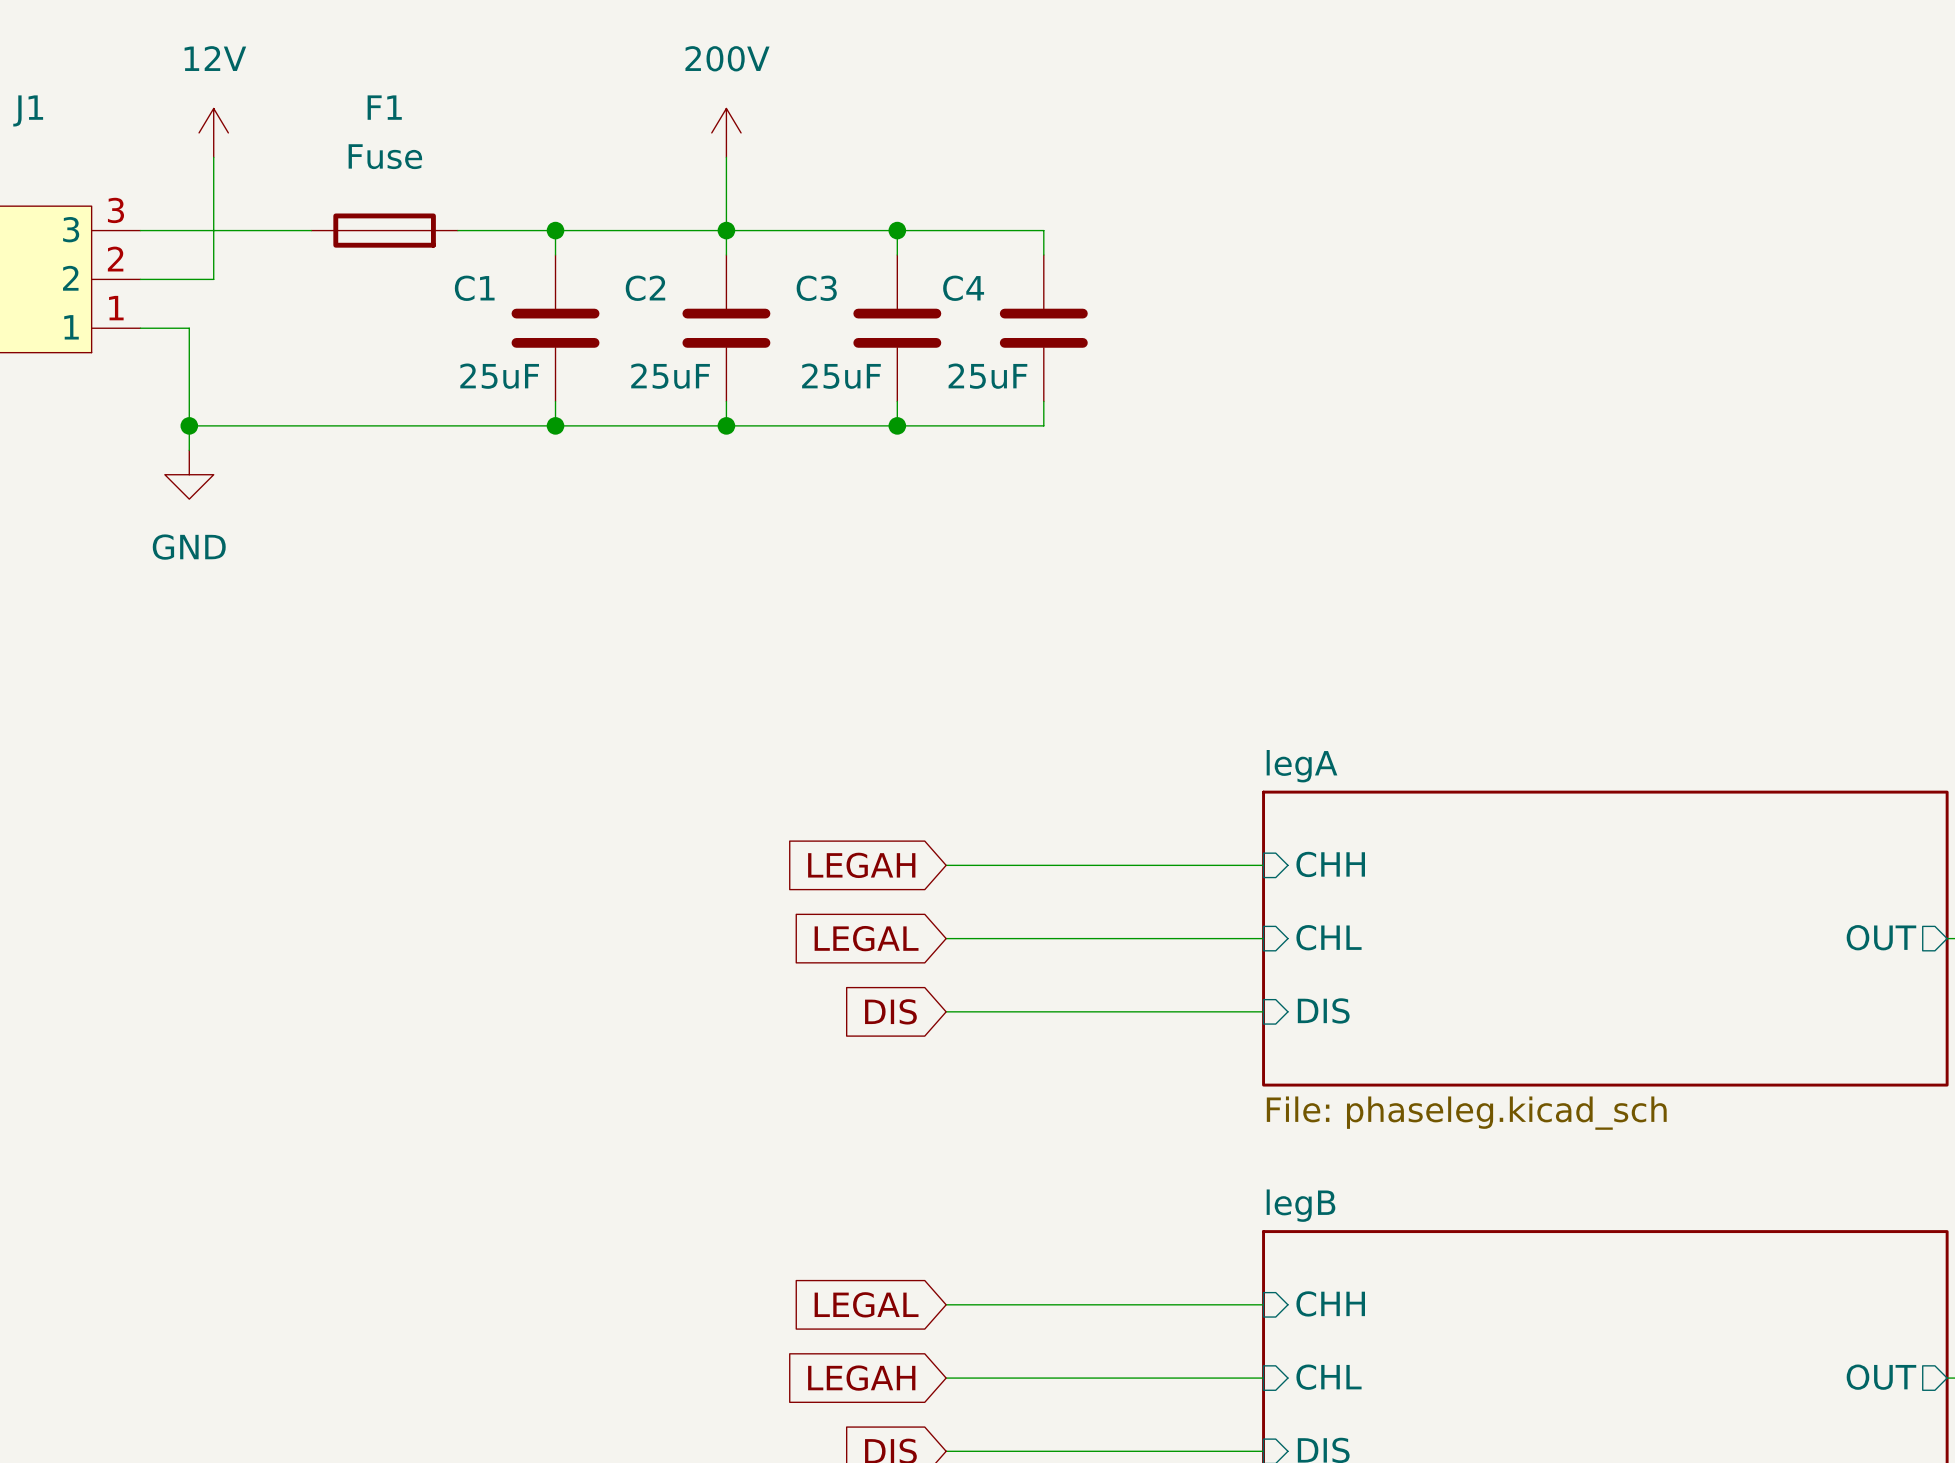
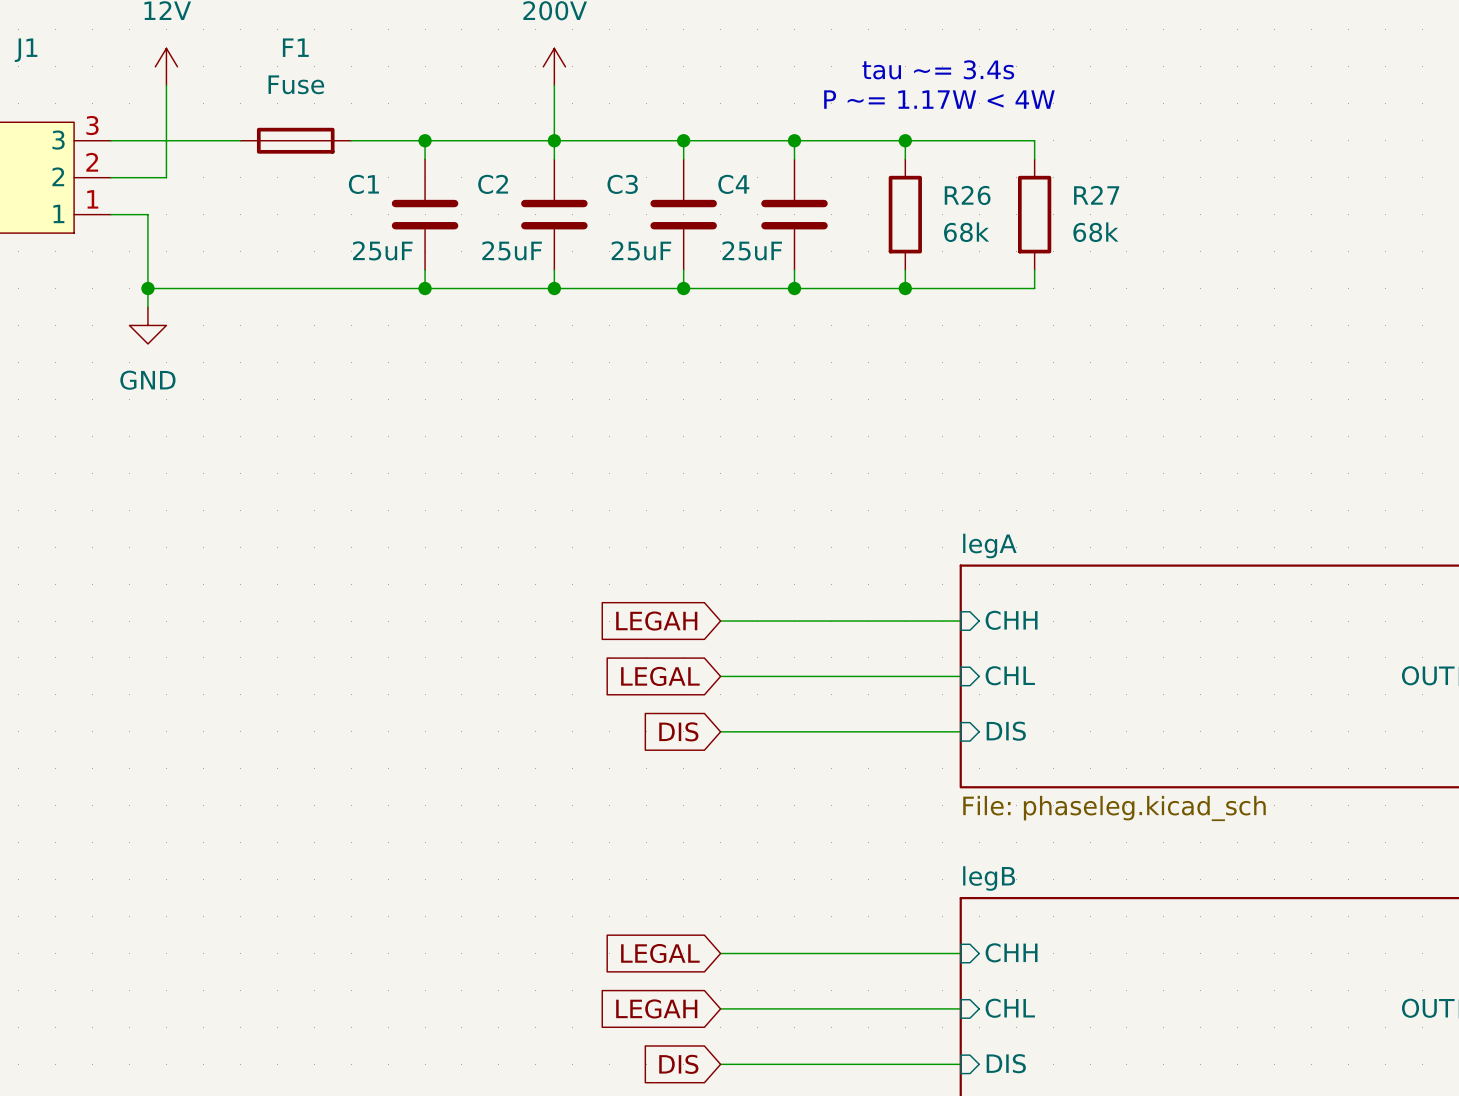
text: none -> tau ~= 3.4s (938, 69)
text: none -> P ~= 1.17W < 4W (939, 99)
wire: none -> (794, 140) (1034, 140) (1034, 159)
junction: none -> (794, 140)
wire: none -> (905, 140) (905, 159)
junction: none -> (905, 140)
R26: none -> 68k (905, 214)
R27: none -> 68k (1034, 214)
wire: none -> (905, 270) (905, 288)
wire: none -> (1034, 270) (1034, 288) (794, 288)
junction: none -> (794, 288)
junction: none -> (905, 288)

